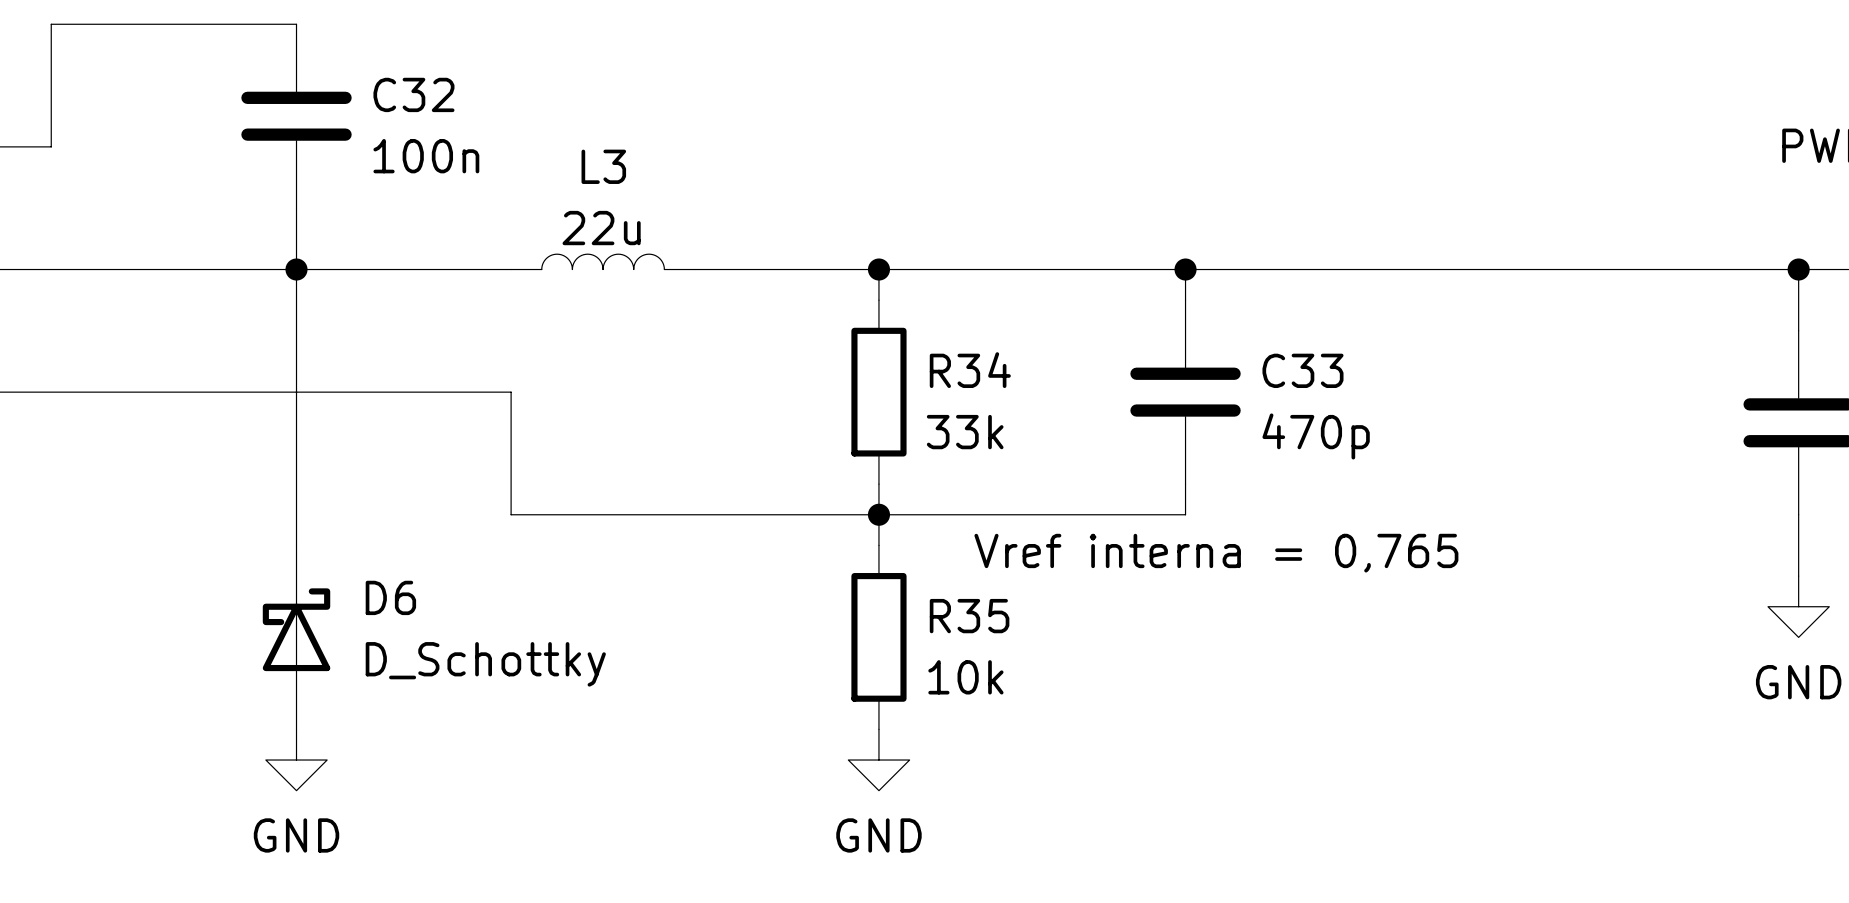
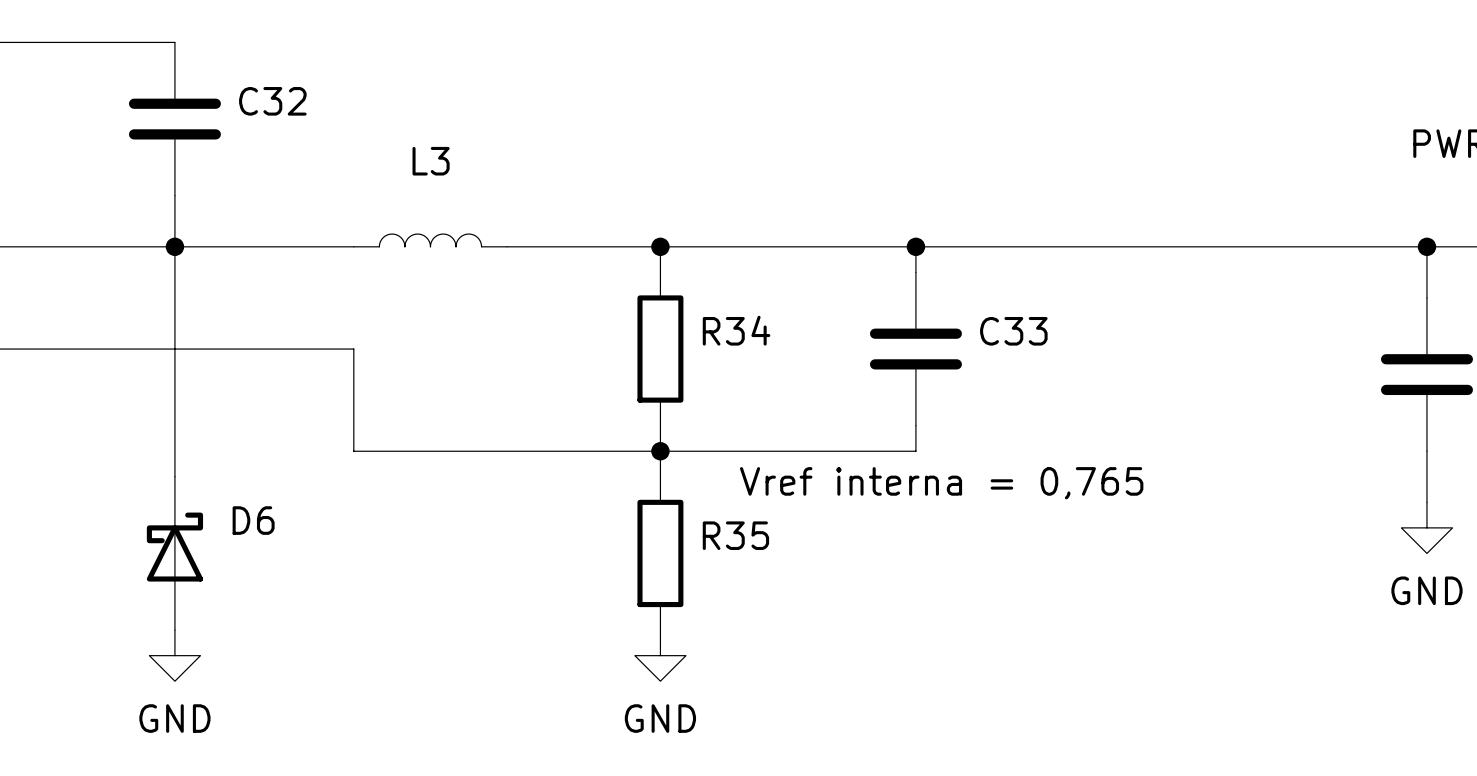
C32 value: 100n (426, 156) -> none
L3 value: 22u (601, 228) -> none
R34 value: 33k (965, 432) -> none
C33 value: 470p (1316, 436) -> none
D6 value: D_Schottky (485, 664) -> none
R35 value: 10k (965, 677) -> none

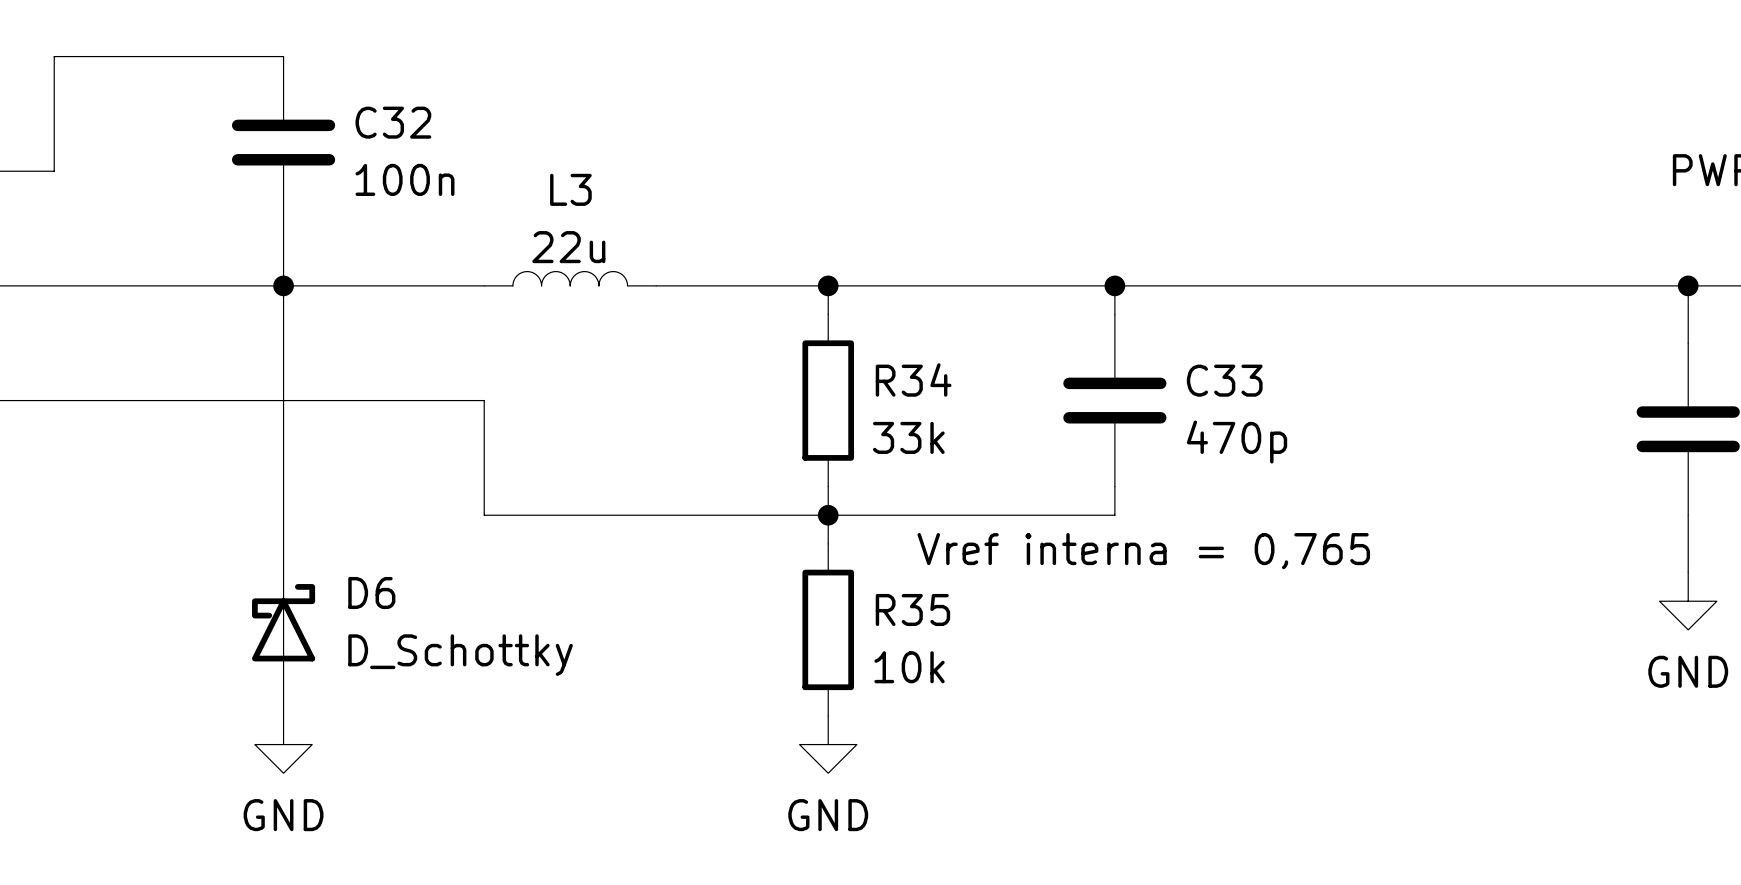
C32 value: none -> 100n (404, 179)
L3 value: none -> 22u (568, 247)
R34 value: none -> 33k (908, 437)
C33 value: none -> 470p (1237, 442)
D6 value: none -> D_Schottky (460, 655)
R35 value: none -> 10k (909, 667)

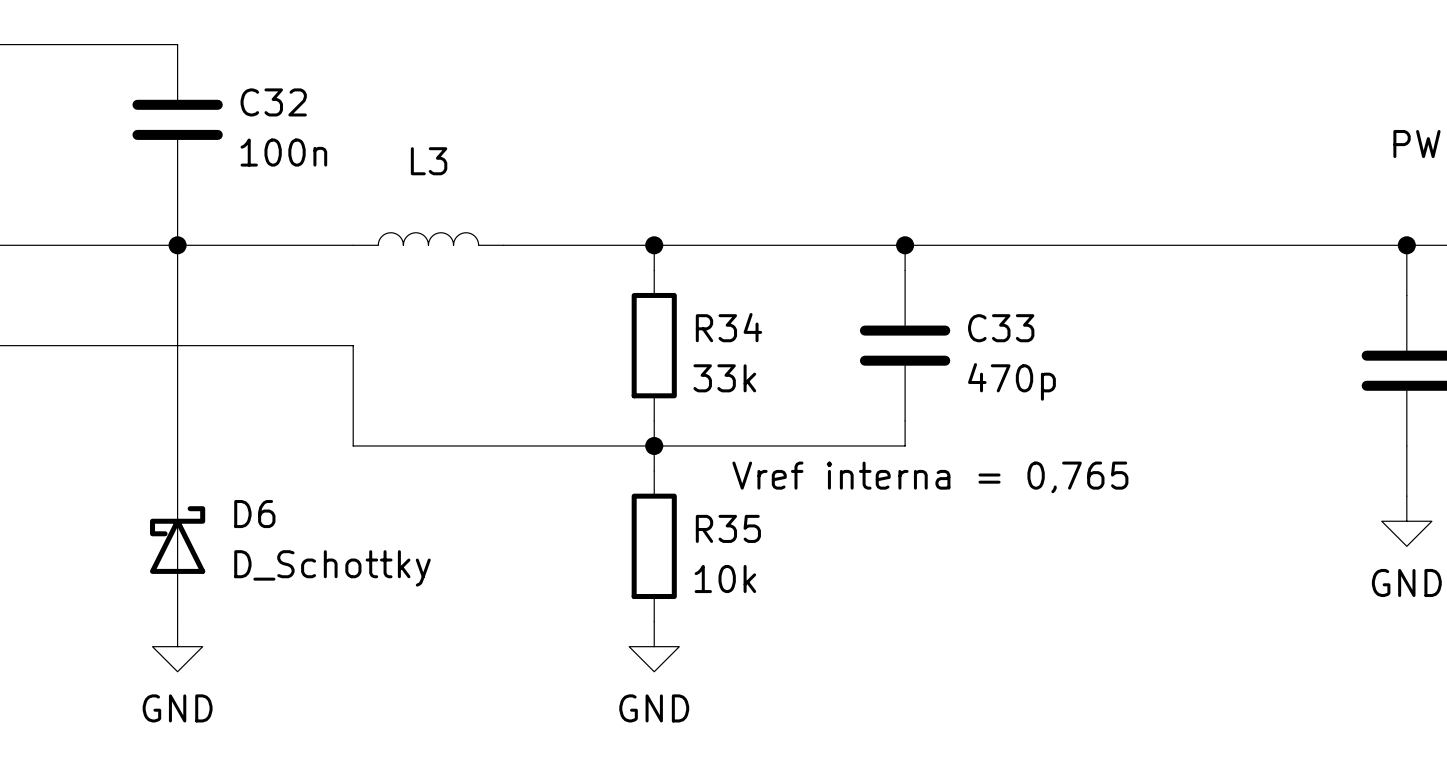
L3 value: 22u (568, 247) -> none

